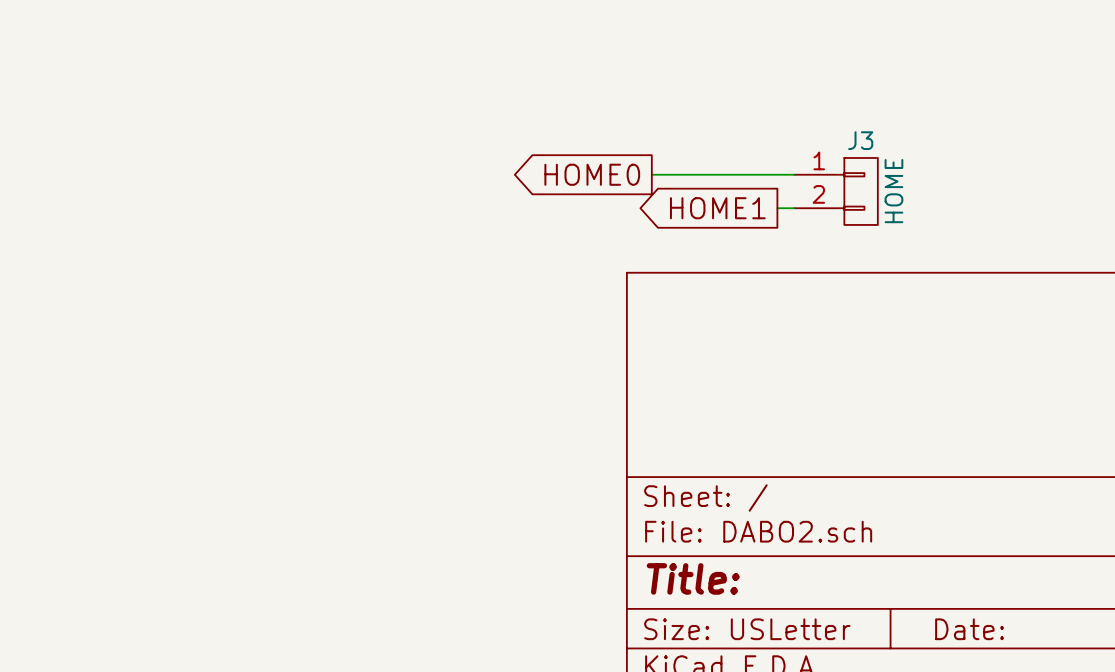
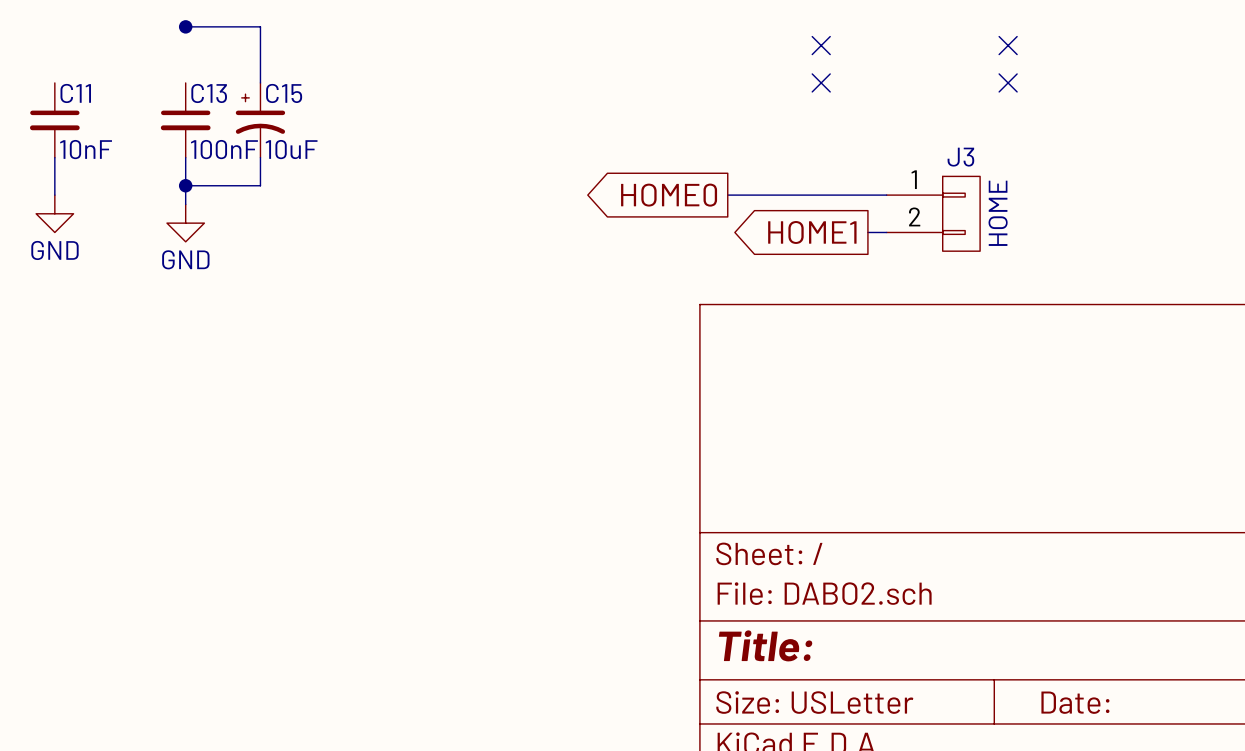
wire: none -> (185, 26) (260, 26) (260, 82)
junction: none -> (185, 26)
no-connect mark: none -> (821, 45)
no-connect mark: none -> (1008, 45)
no-connect mark: none -> (821, 82)
no-connect mark: none -> (1008, 82)
C11: none -> 10nF (54, 120)
C13: none -> 100nF (185, 120)
C15: none -> 10uF (260, 120)
wire: none -> (54, 157) (54, 195)
wire: none -> (185, 157) (185, 204)
wire: none -> (260, 157) (260, 185) (185, 185)
junction: none -> (185, 185)
power symbol: none -> GND (54, 213)
power symbol: none -> GND (185, 223)

